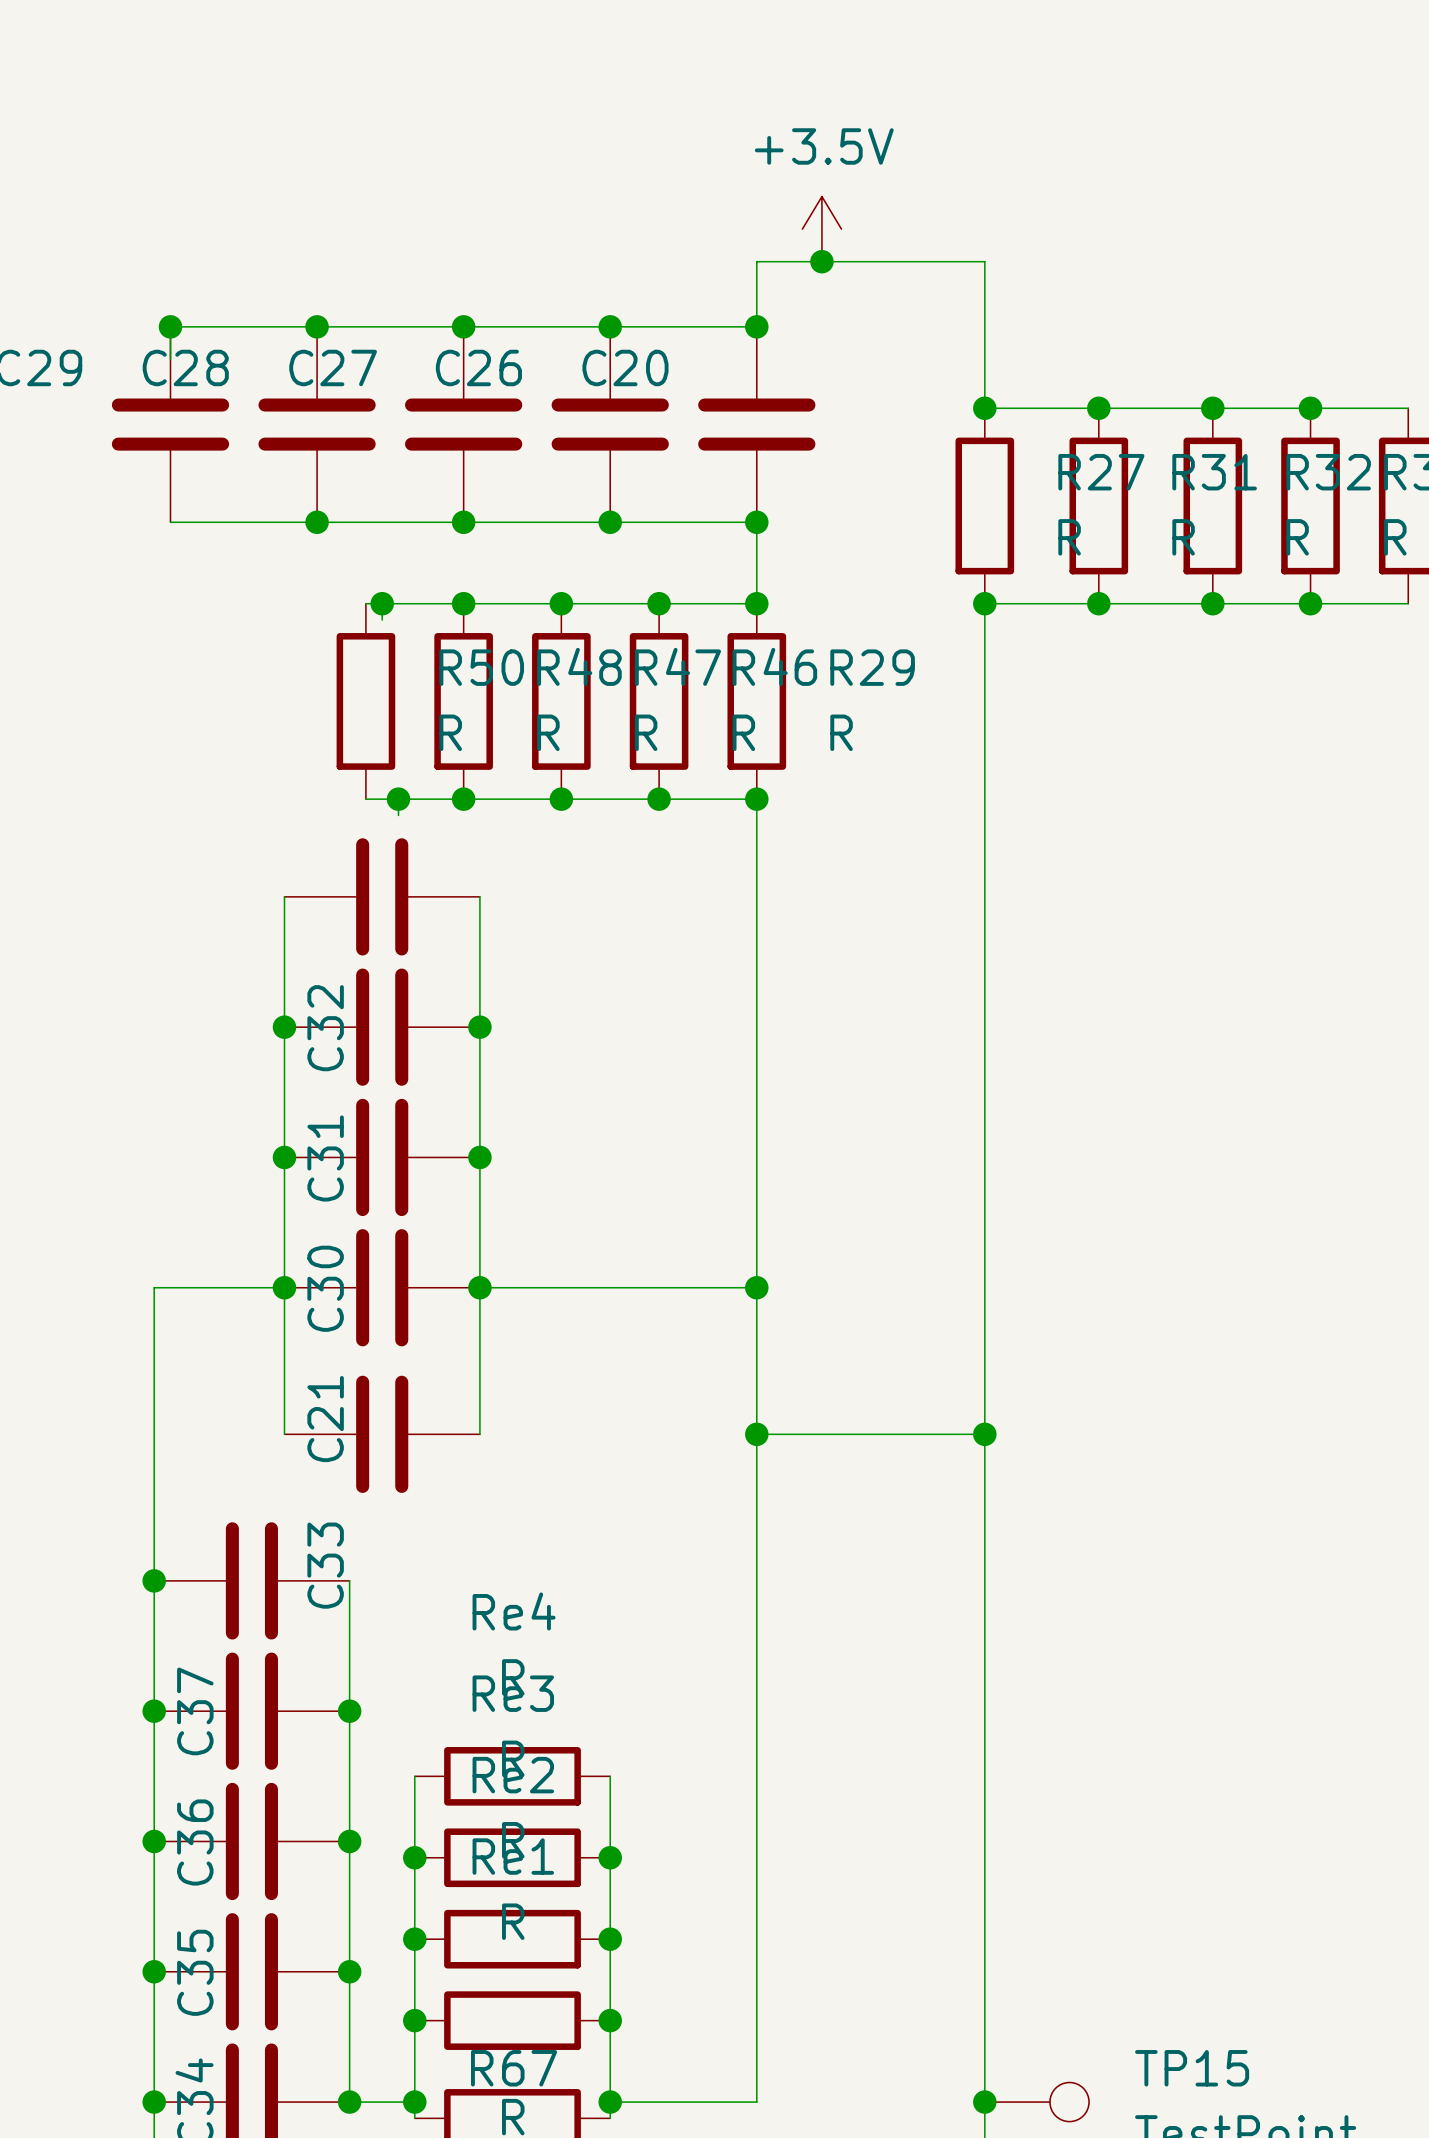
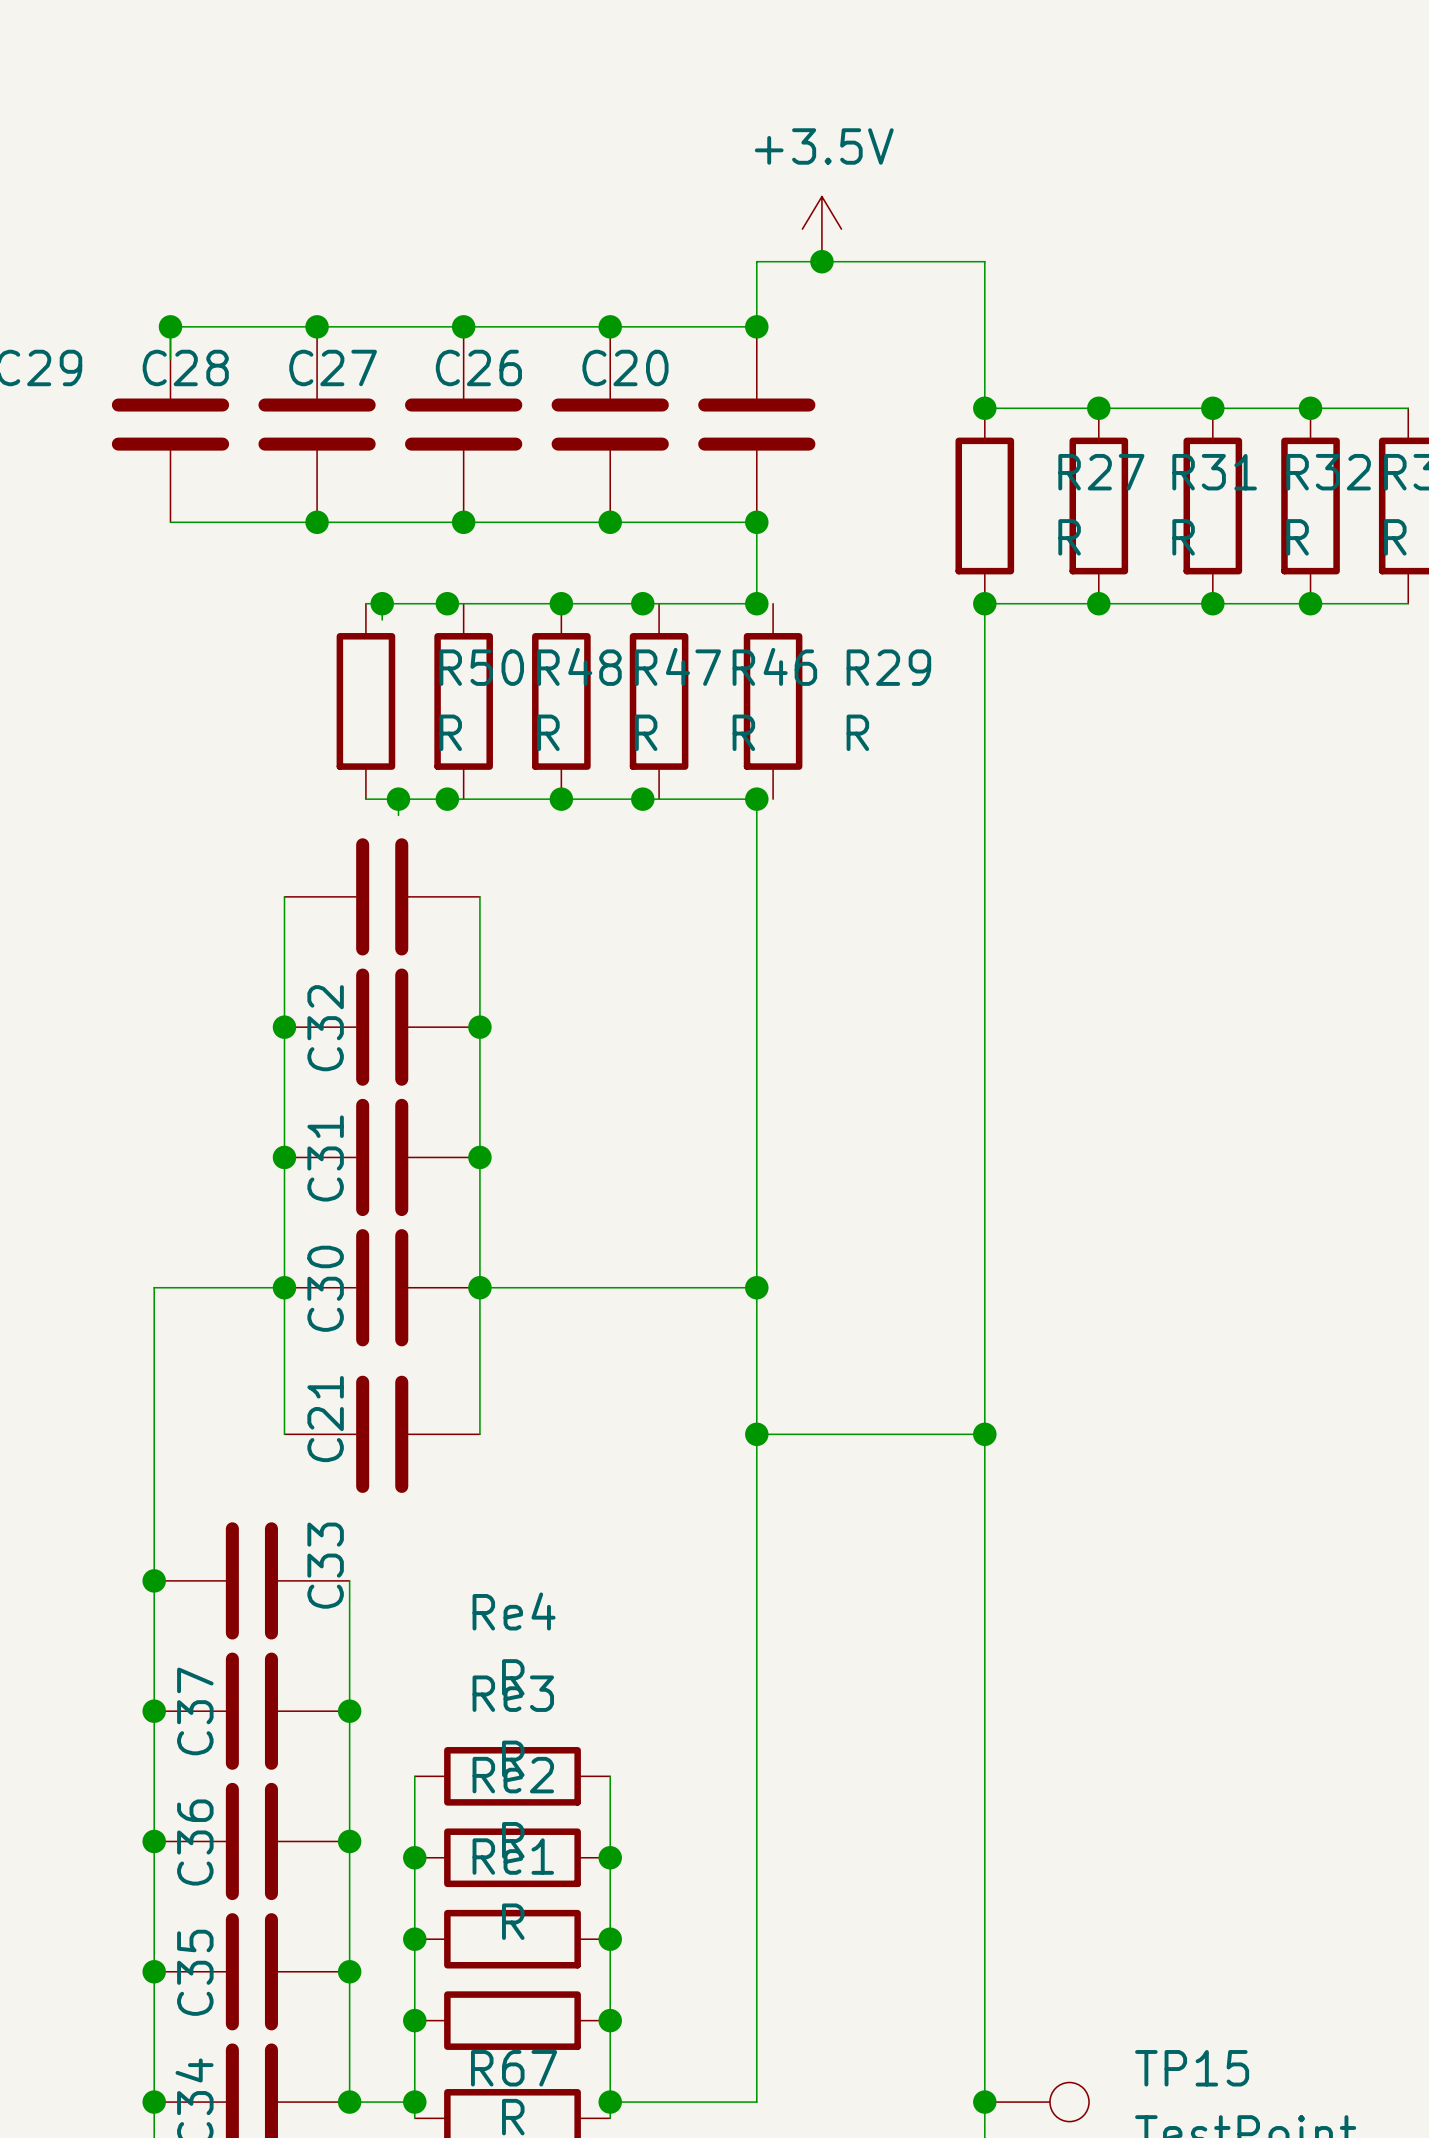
junction position: (463, 603) -> (447, 603)
junction position: (659, 603) -> (642, 603)
R29 position: (756, 701) -> (773, 701)
junction position: (463, 799) -> (447, 799)
junction position: (659, 799) -> (642, 799)

